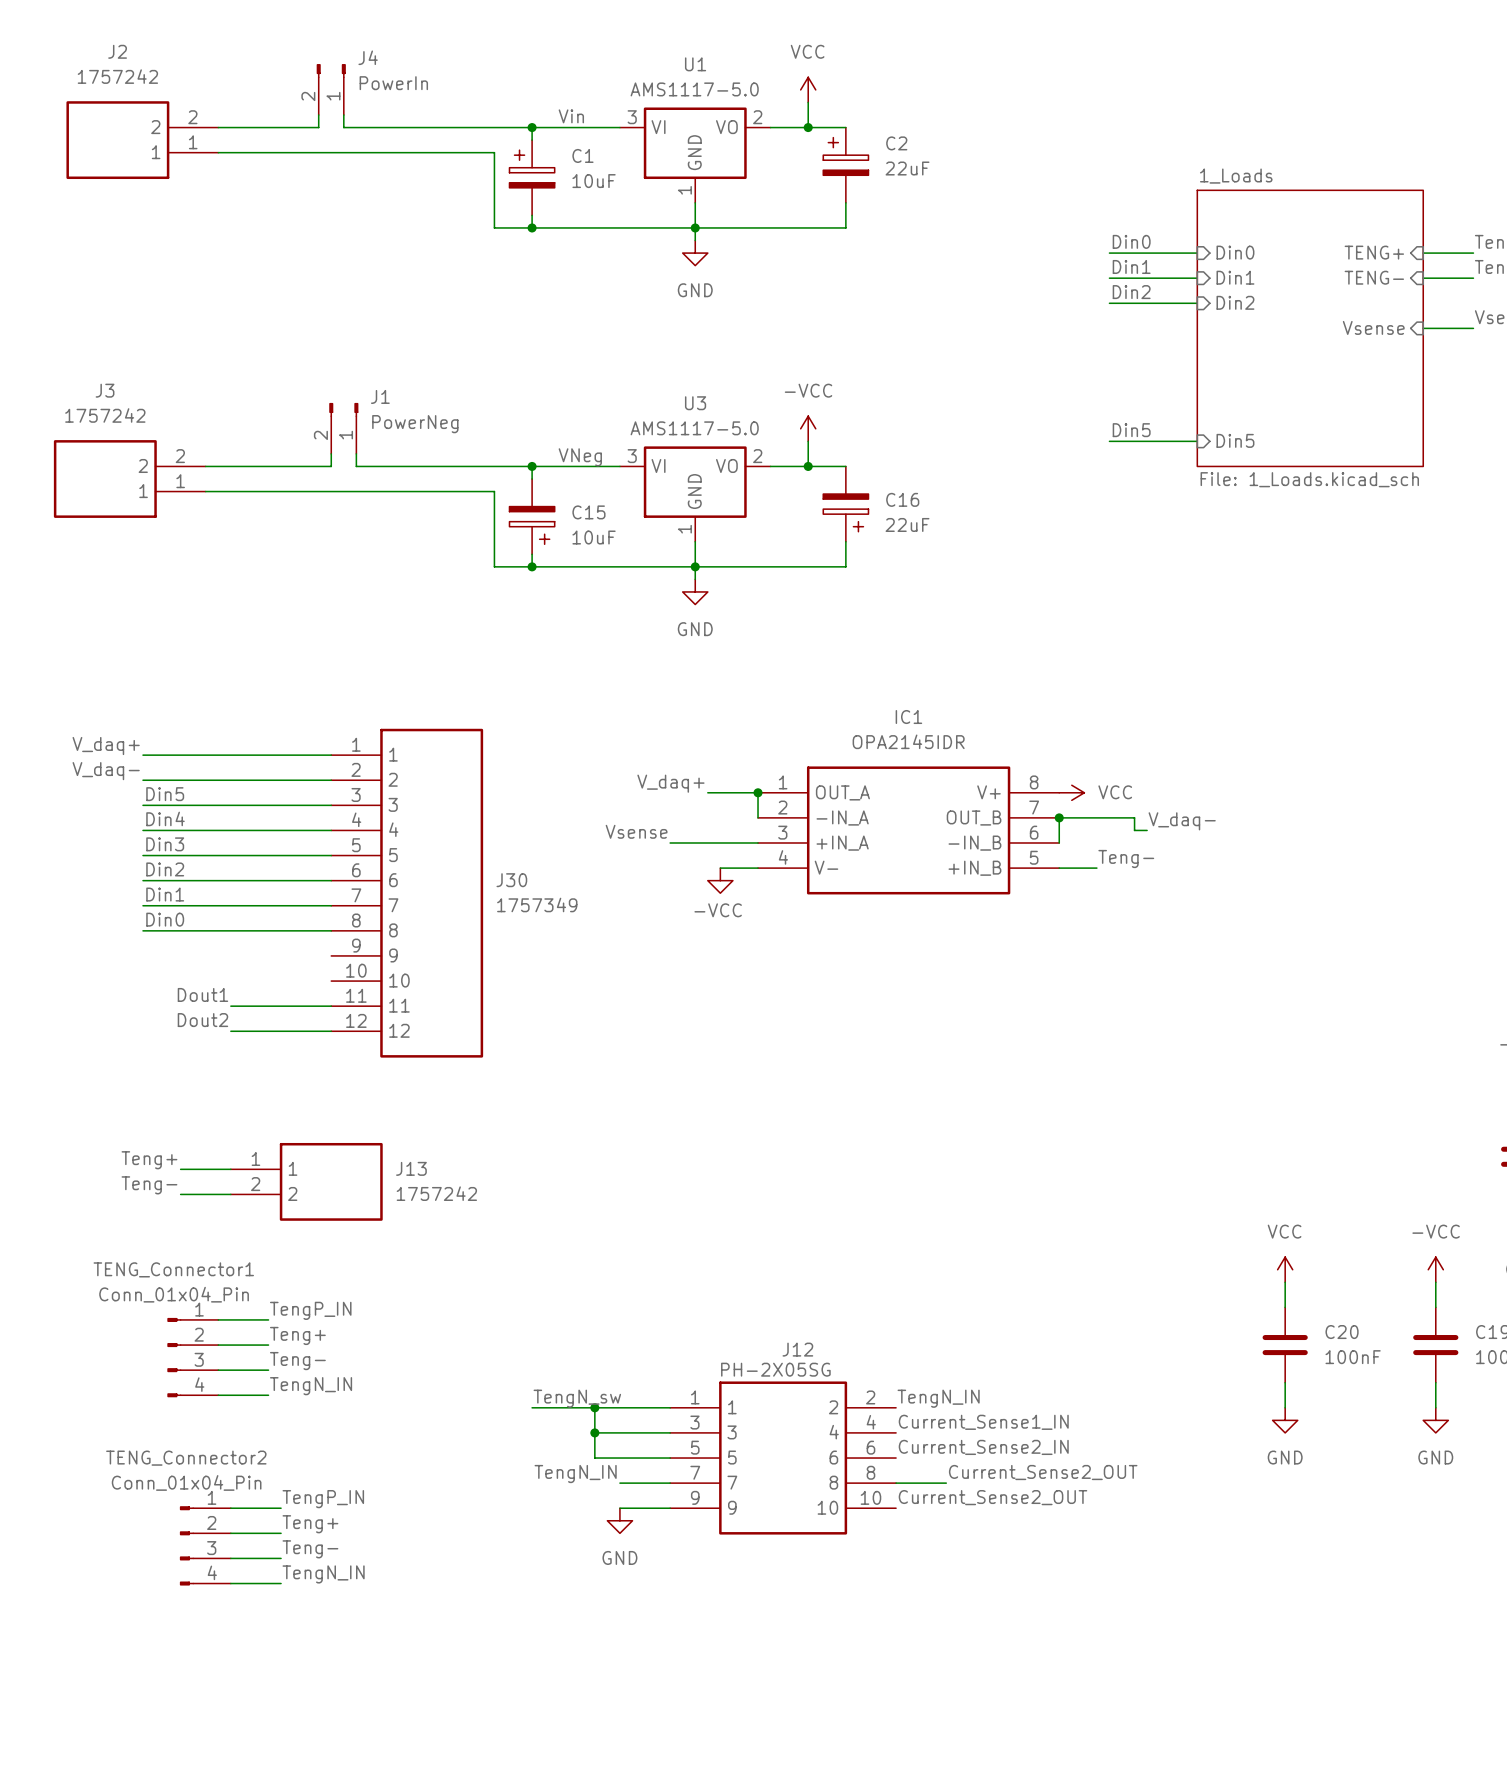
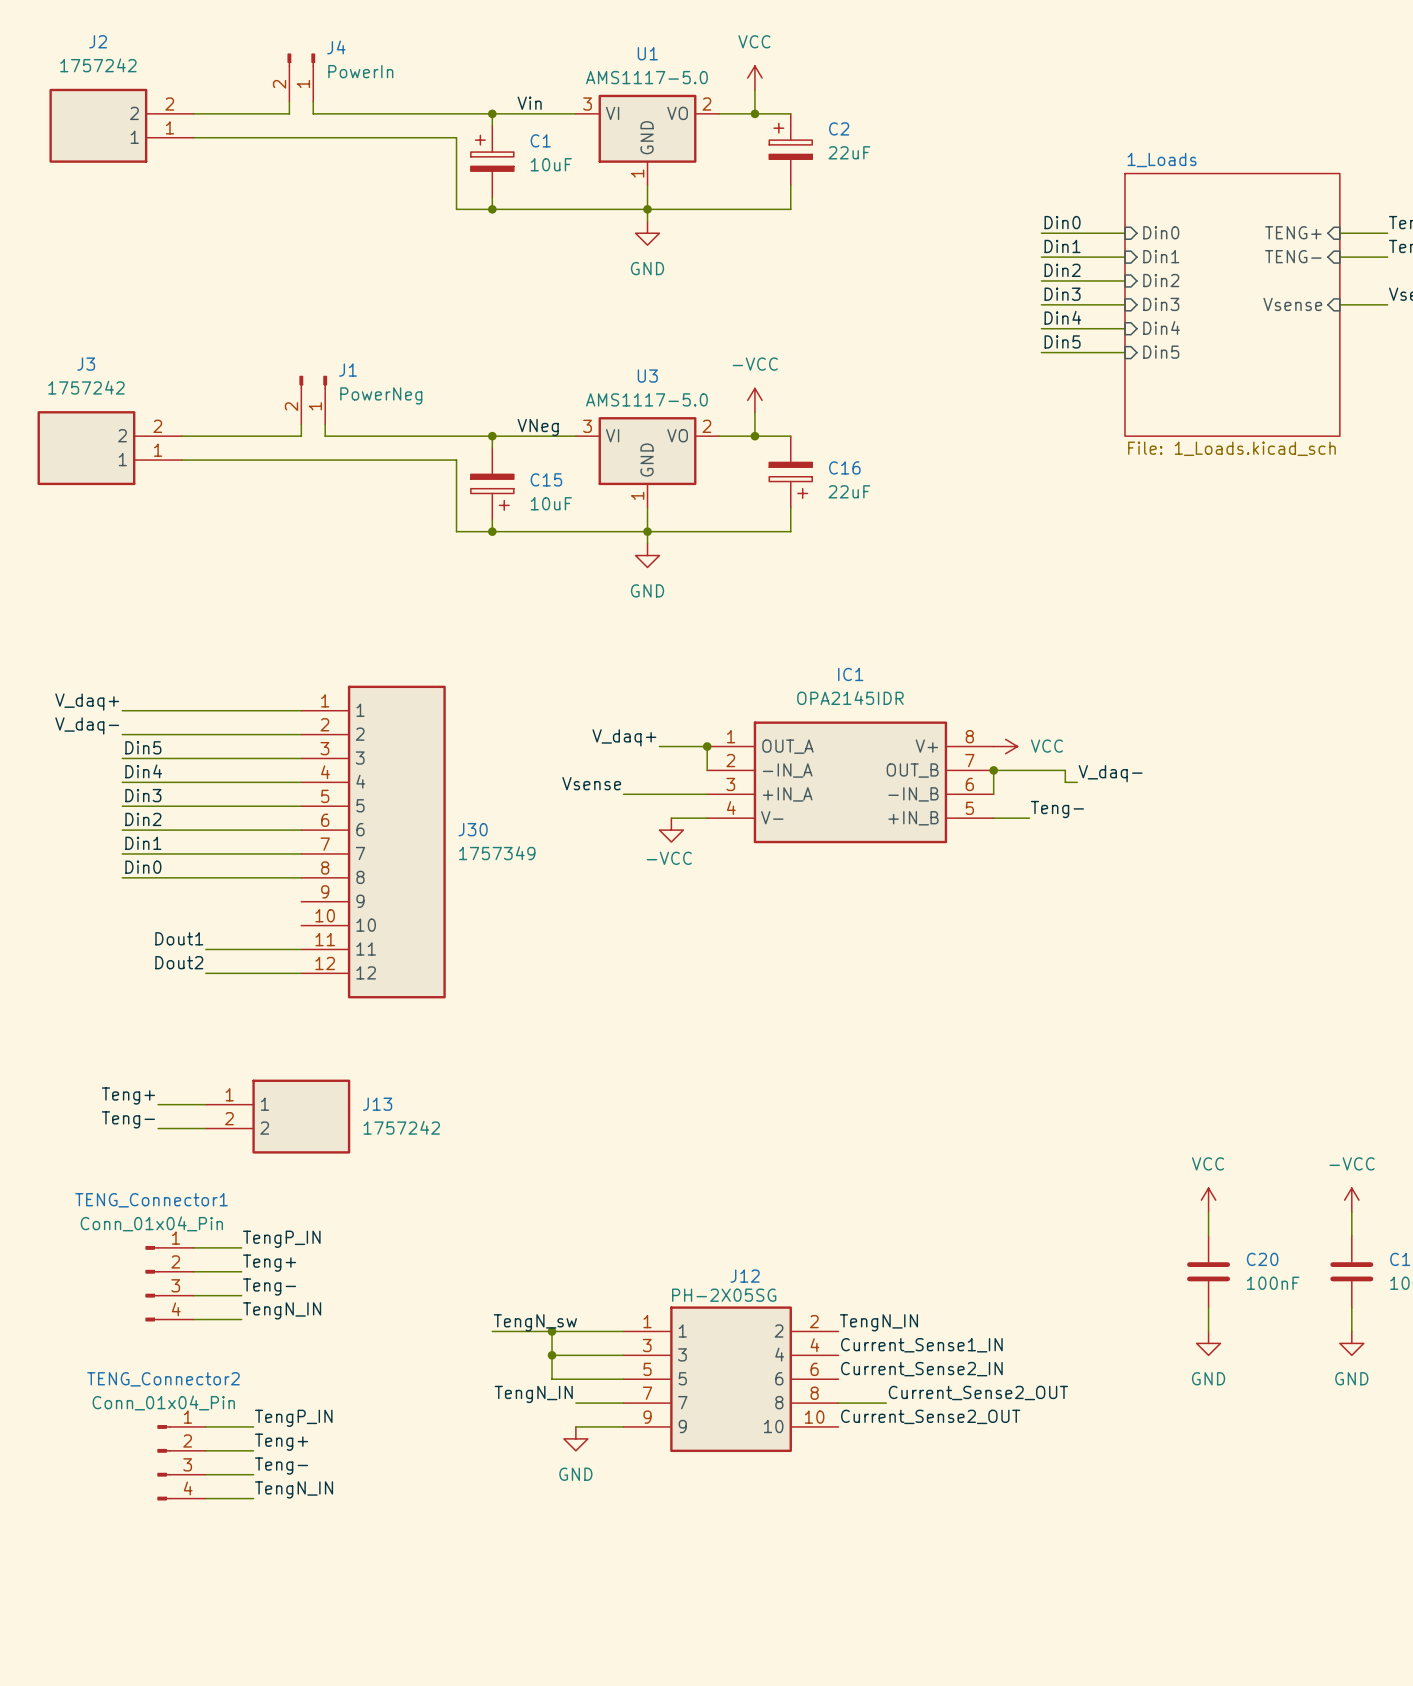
label: none -> Din3 (1062, 294)
sheet pin: none -> Din3 (1161, 304)
wire: none -> (1041, 304) (1125, 304)
label: none -> Din4 (1062, 317)
sheet pin: none -> Din4 (1161, 328)
wire: none -> (1041, 328) (1125, 328)
label position: Din5 (1131, 430) -> Din5 (1062, 341)
sheet pin position: Din5 (1235, 440) -> Din5 (1161, 352)
wire: (1109, 441) (1197, 441) -> (1041, 352) (1125, 352)

